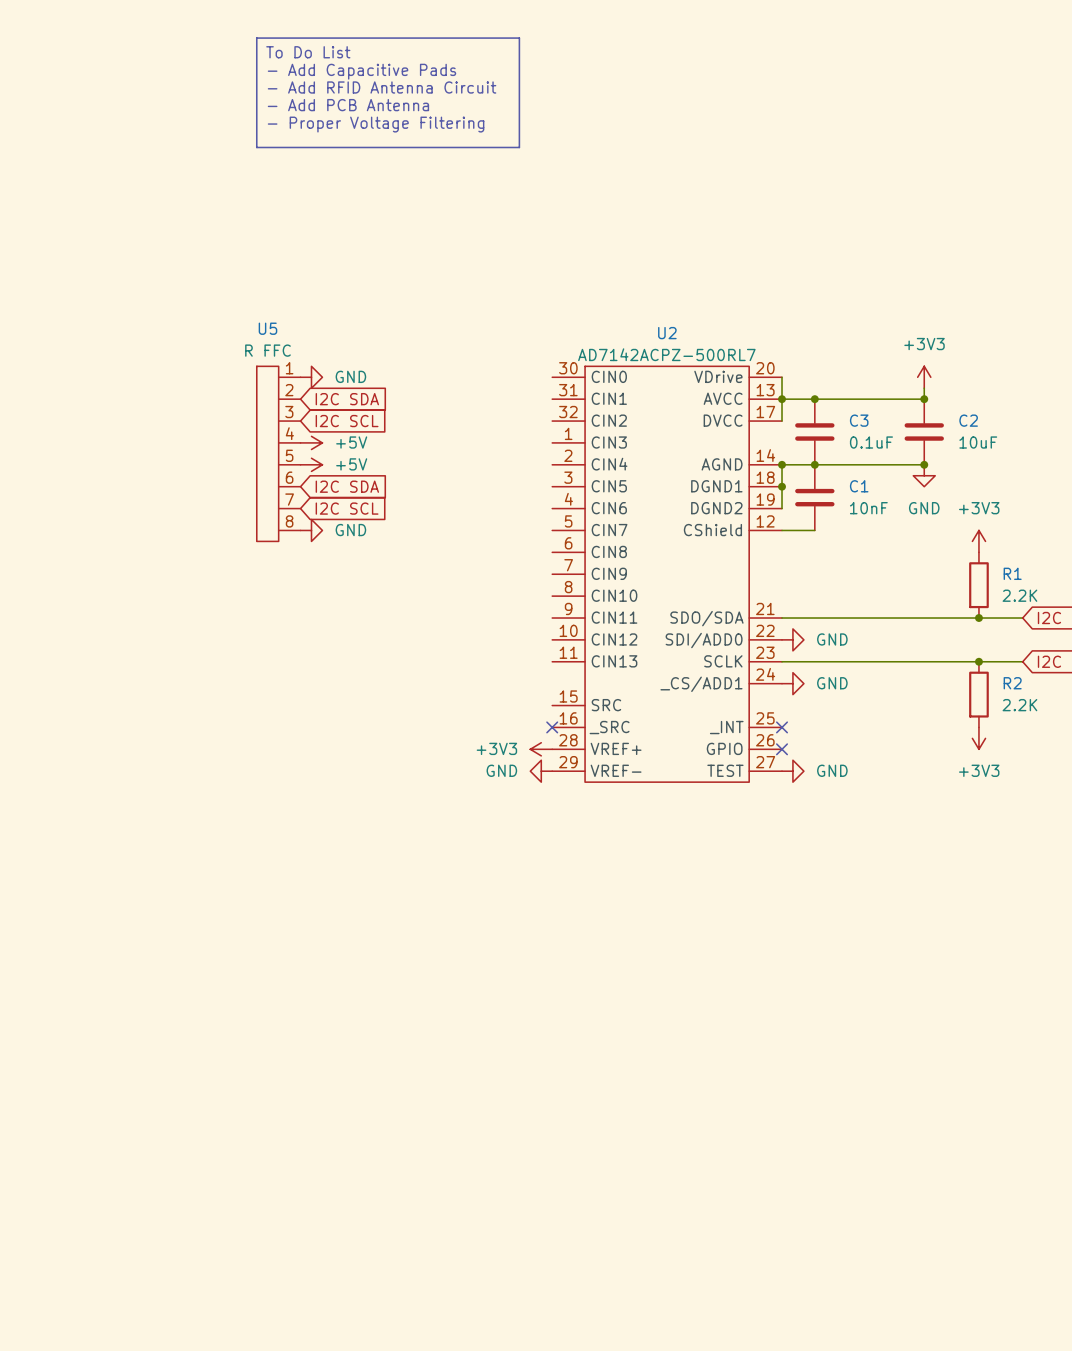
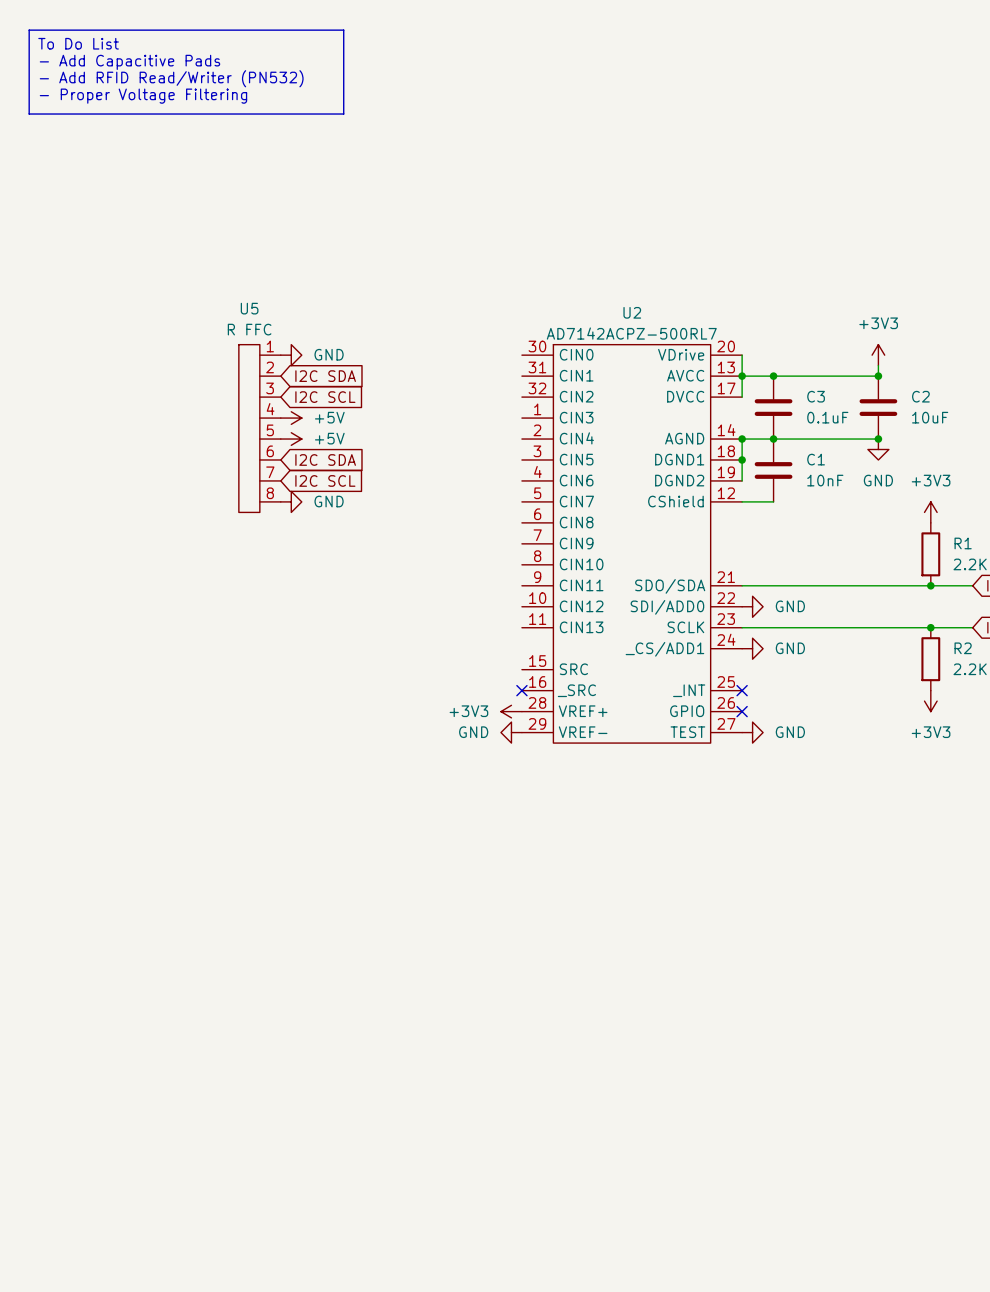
line: (256, 38) (256, 147) (519, 147) (519, 38) (366, 38) -> (238, 30) (29, 30) (29, 114) (343, 114) (343, 30)
text: none -> To Do List (78, 43)
text: To Do List (308, 52) -> none
text: none -> - Add Capacitive Pads (129, 62)
text: - Add Capacitive Pads (361, 71) -> none
text: - Add RFID Antenna Circuit (382, 87) -> none
text: none -> - Add RFID Read/Writer (PN532) (171, 78)
text: - Add PCB Antenna (348, 105) -> none
text: none -> - Proper Voltage Filtering (143, 96)
text: - Proper Voltage Filtering (376, 124) -> none

